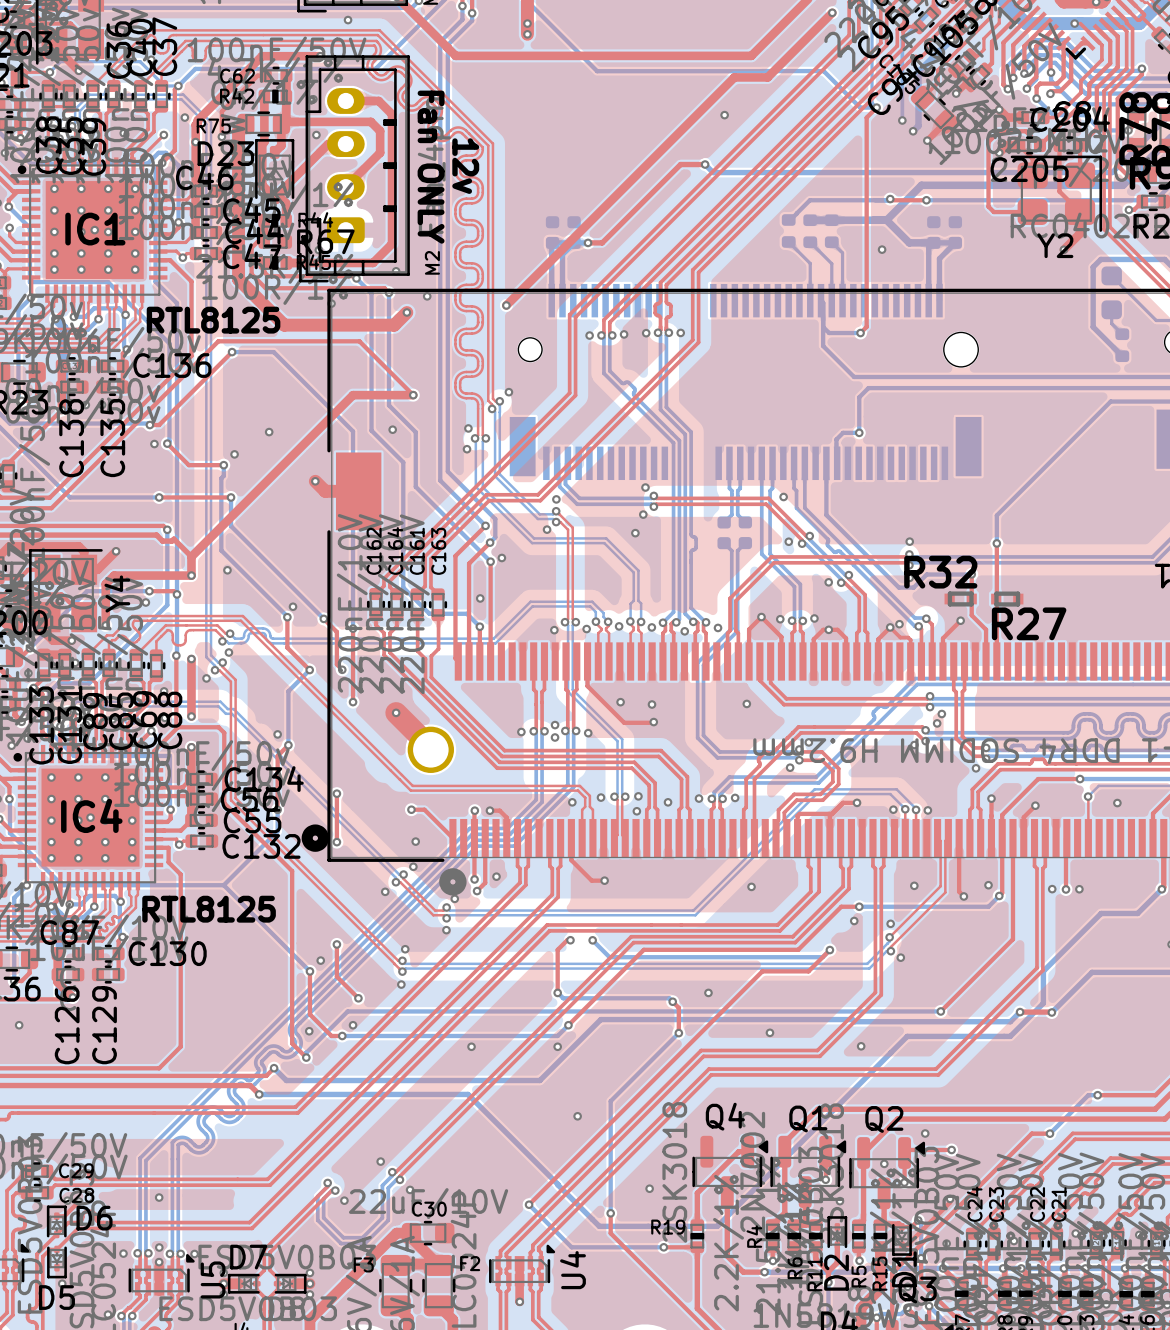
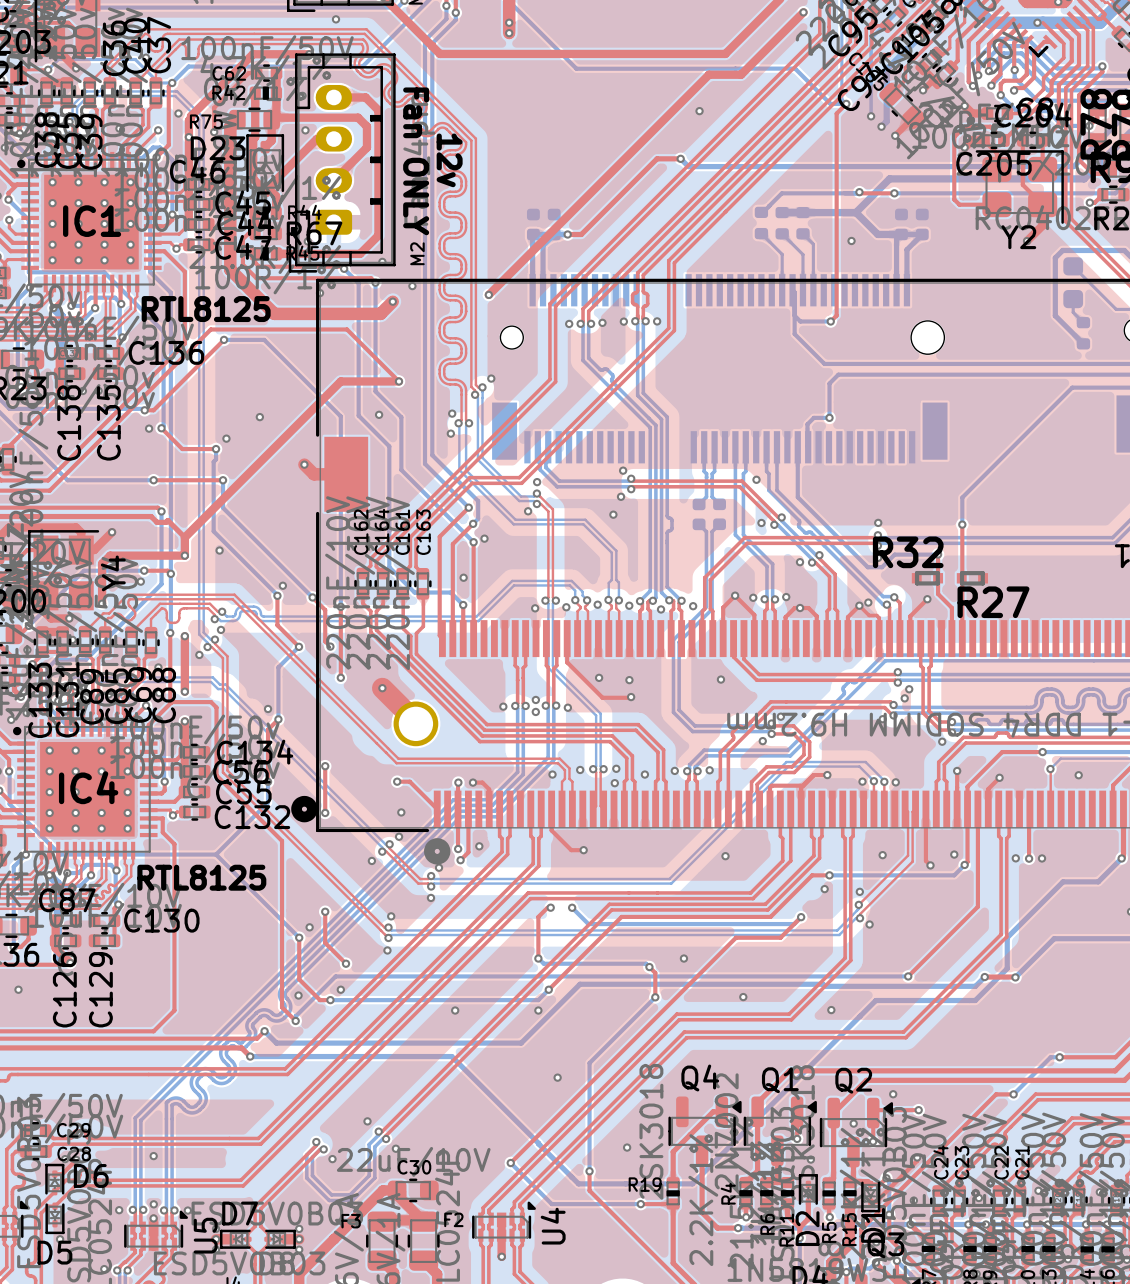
via: (94, 230) -> none
via: (90, 817) -> none

